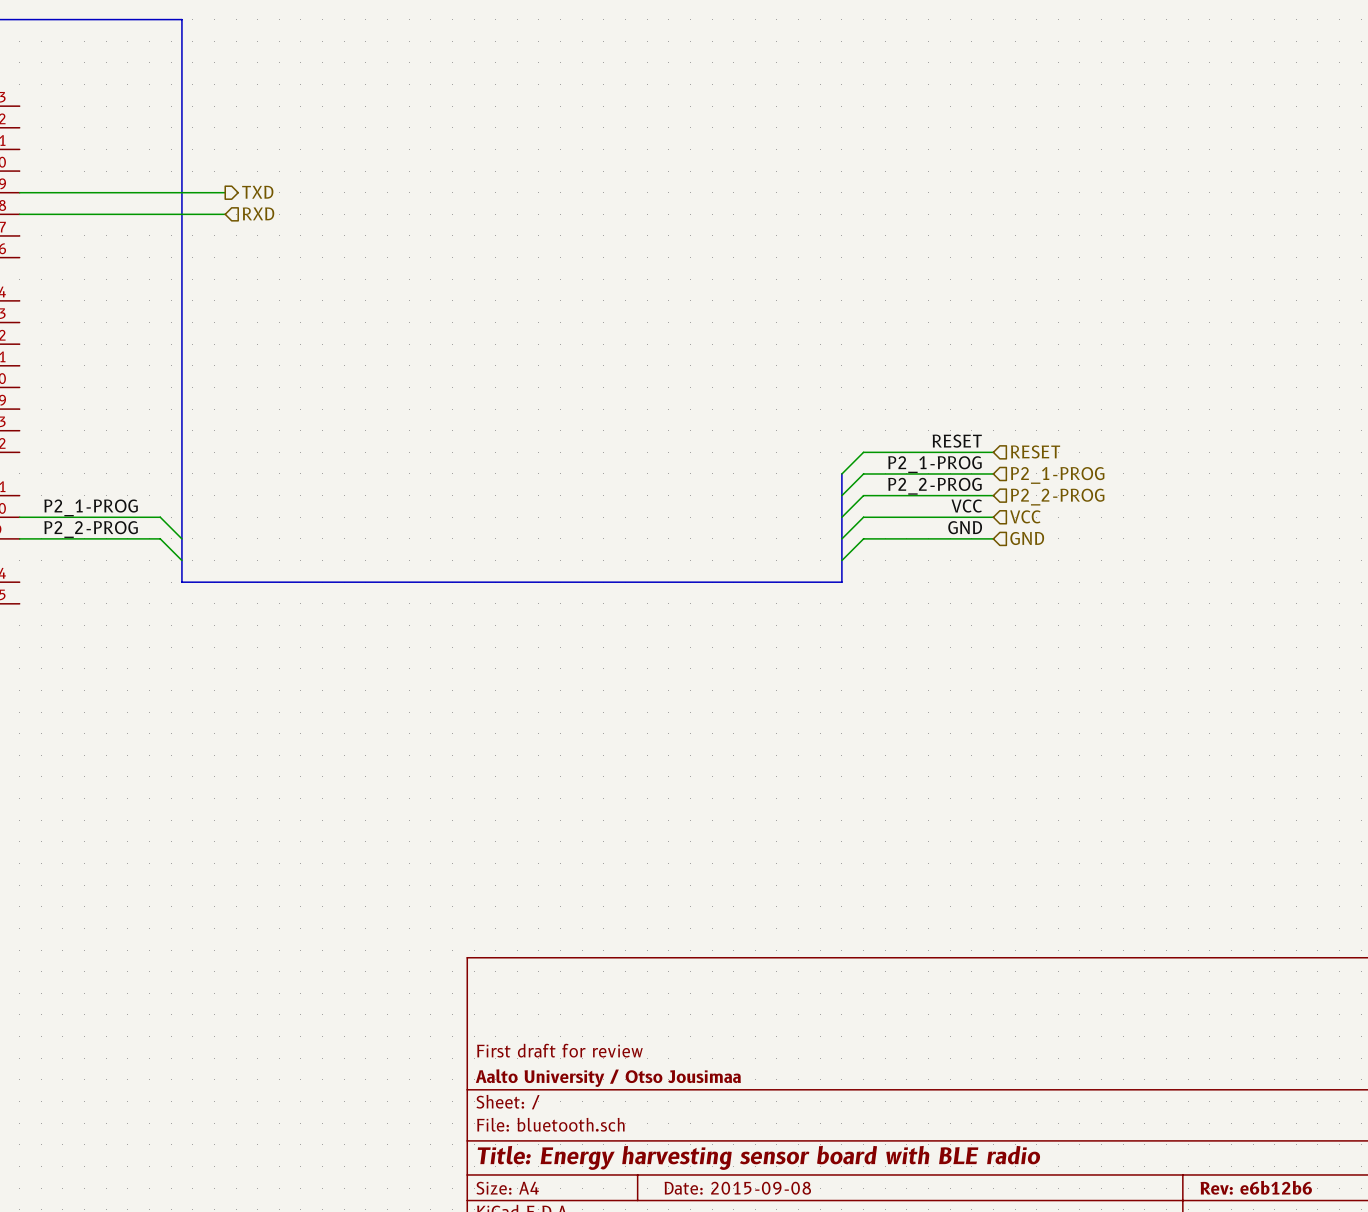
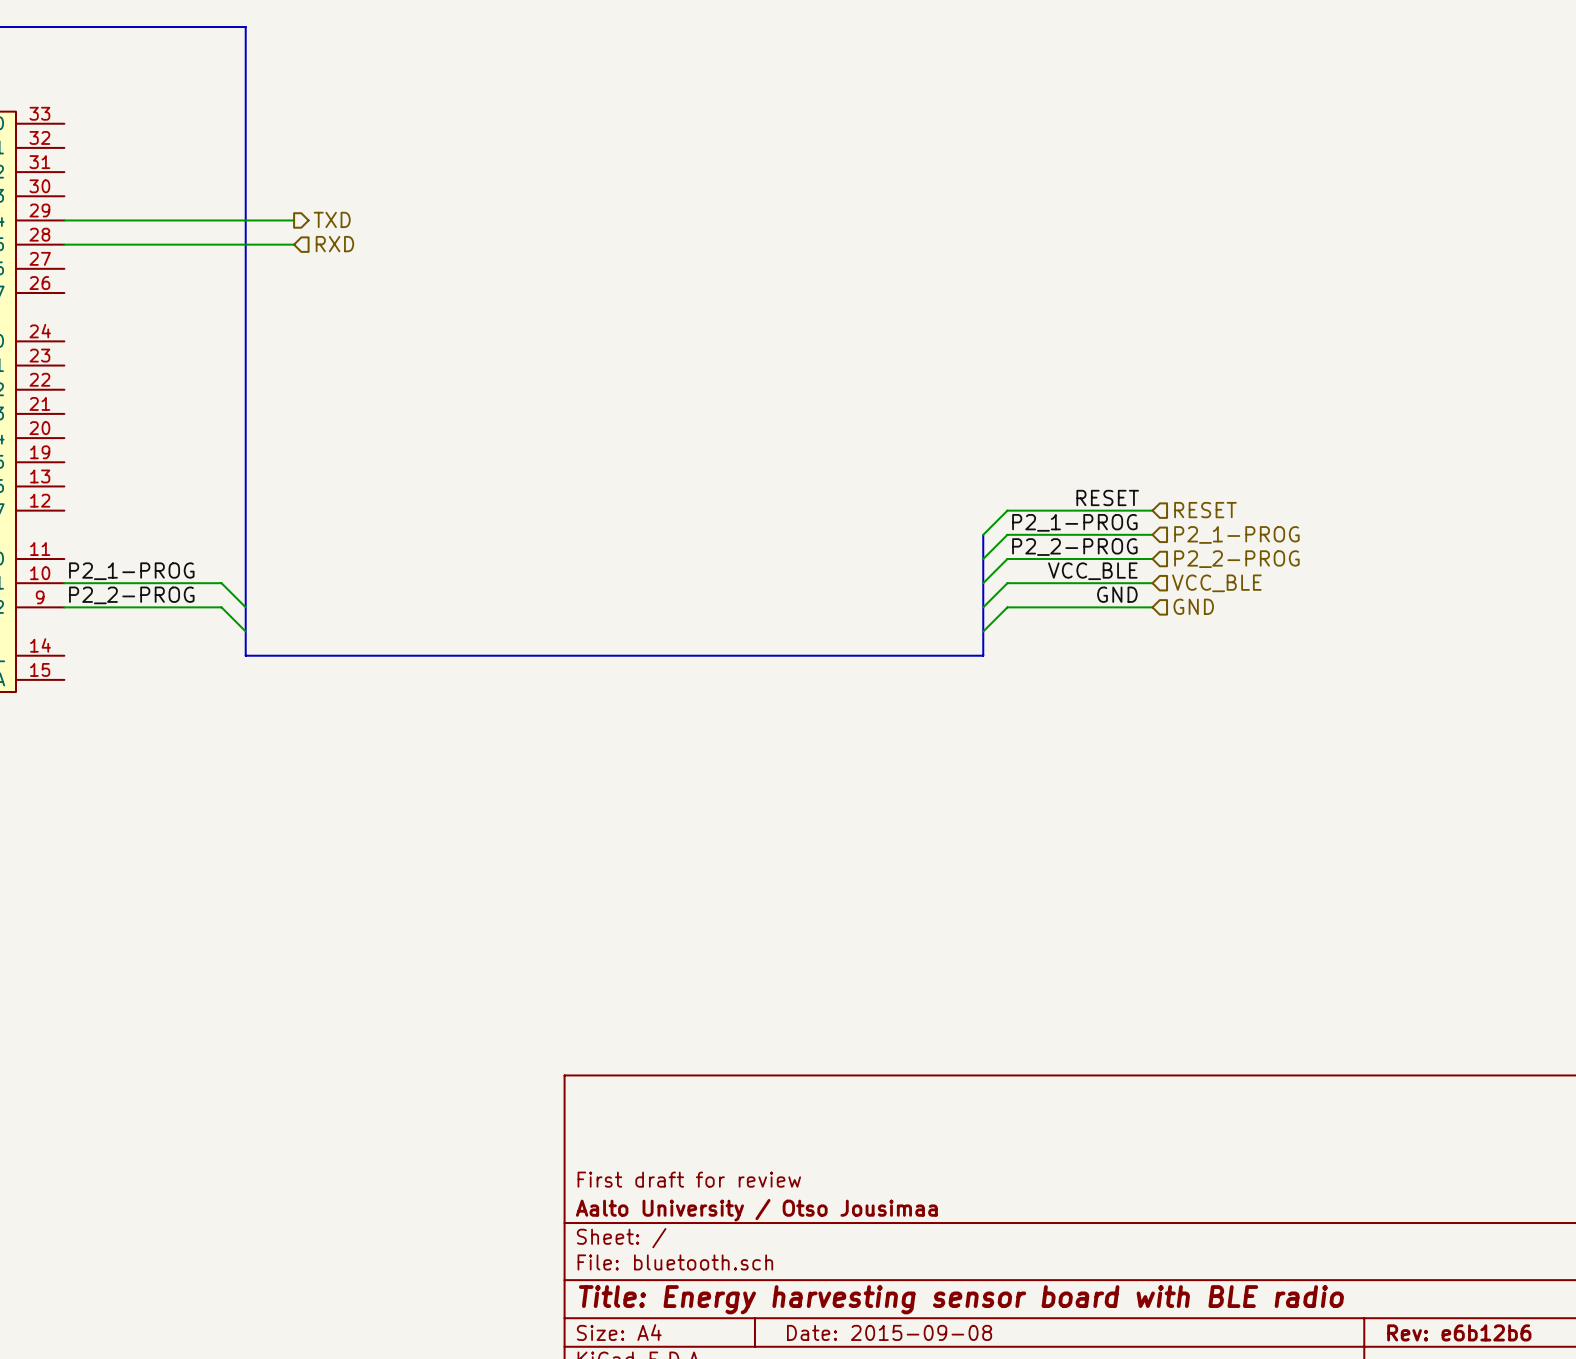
label: VCC (966, 506) -> VCC_BLE (1092, 571)
hierarchical label: VCC (1025, 516) -> VCC_BLE (1216, 583)

